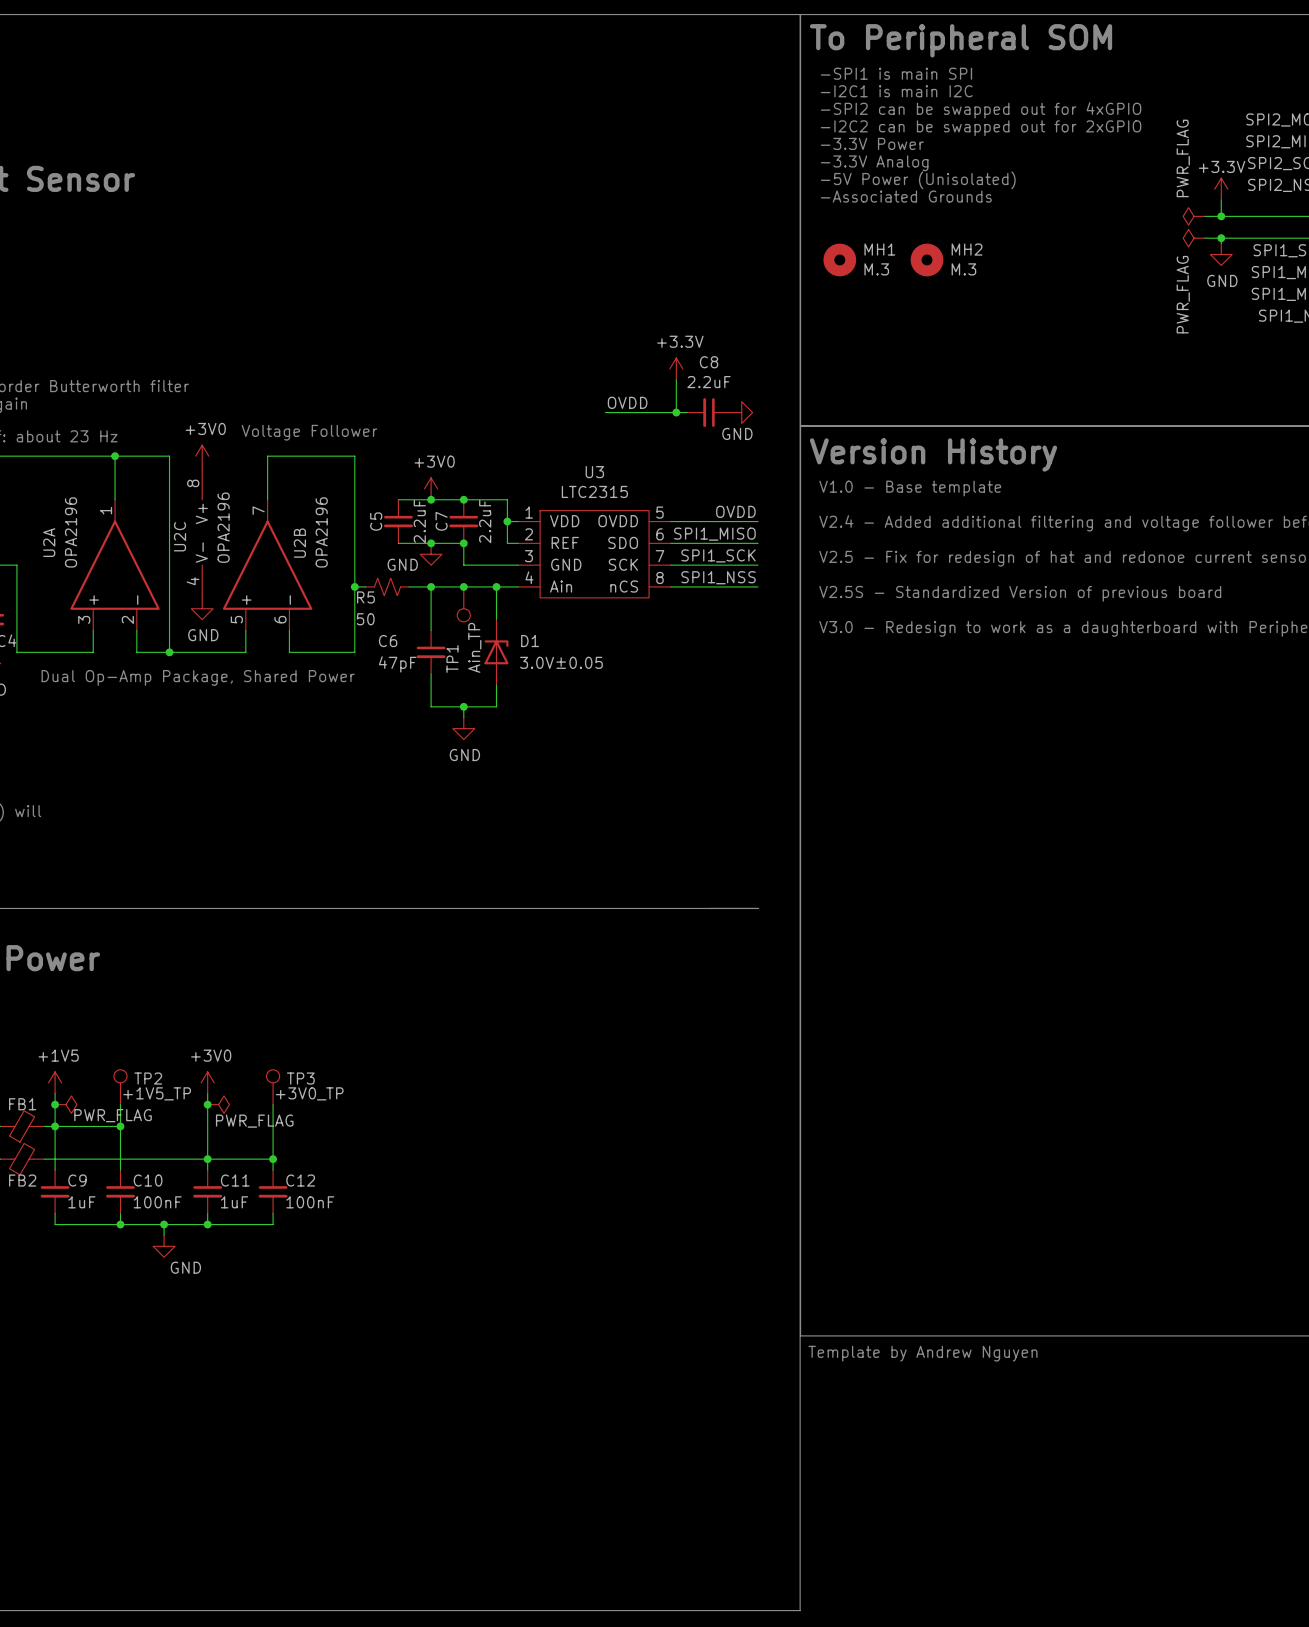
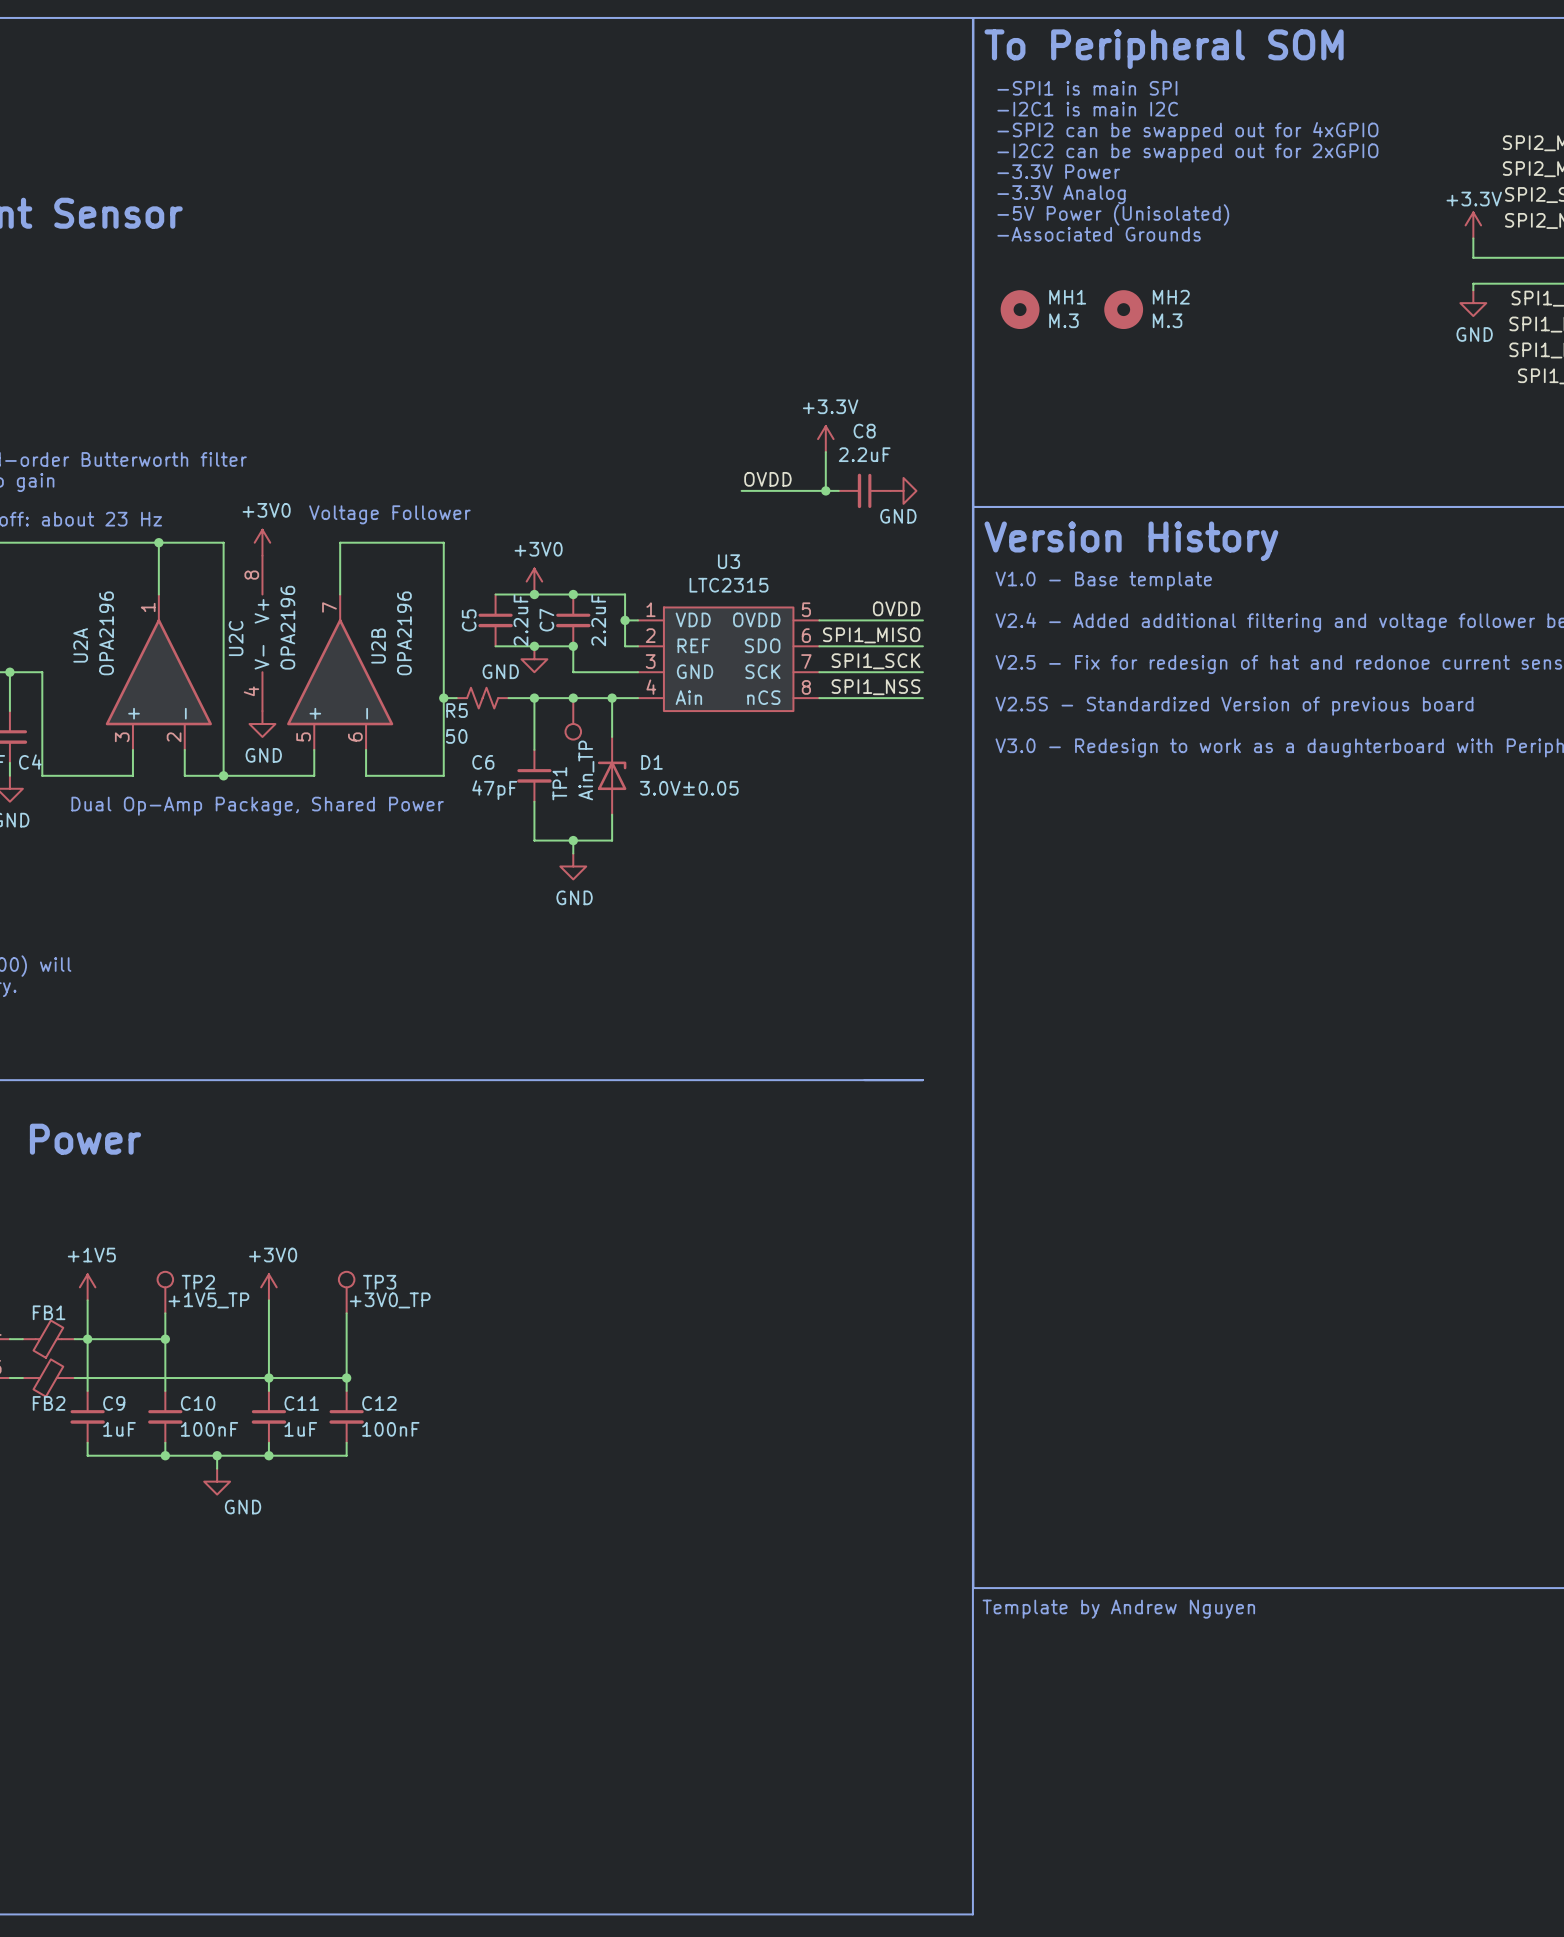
power symbol: PWR_FLAG (1194, 216) -> none
wire: (1204, 216) (1221, 216) -> none
junction: (1221, 216) -> none
power symbol: PWR_FLAG (1194, 238) -> none
wire: (1204, 238) (1221, 238) -> none
junction: (1221, 238) -> none
junction: (55, 1104) -> none
power symbol: PWR_FLAG (65, 1104) -> none
junction: (207, 1104) -> none
power symbol: PWR_FLAG (218, 1104) -> none

